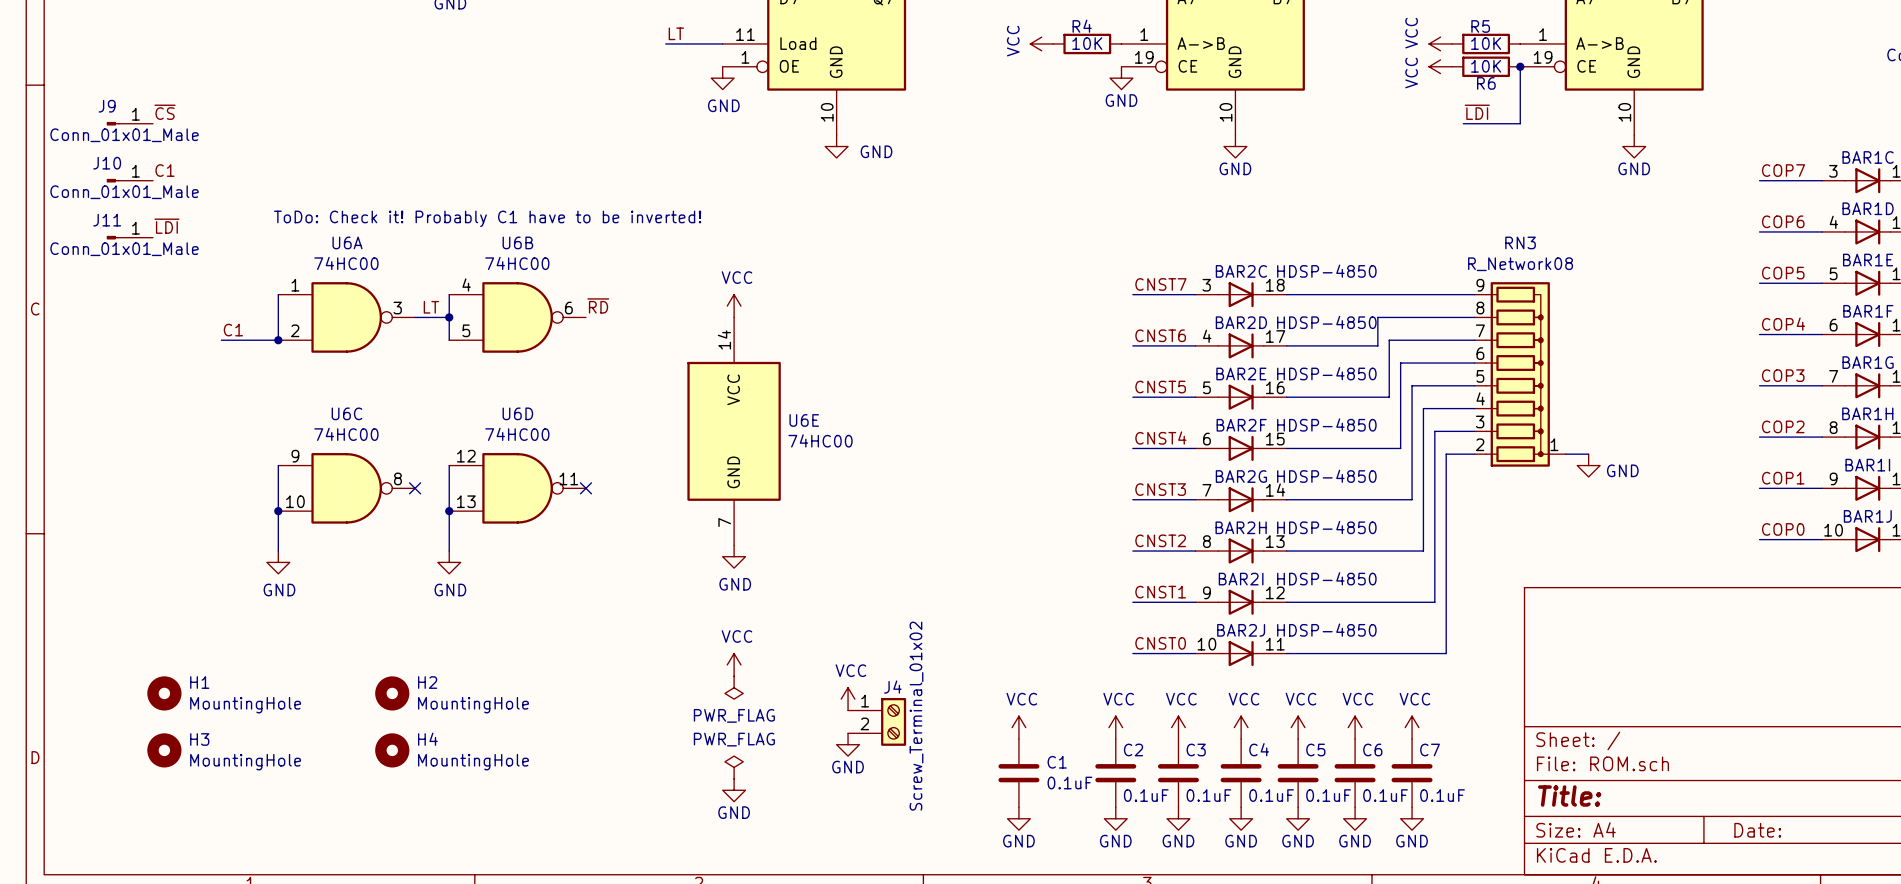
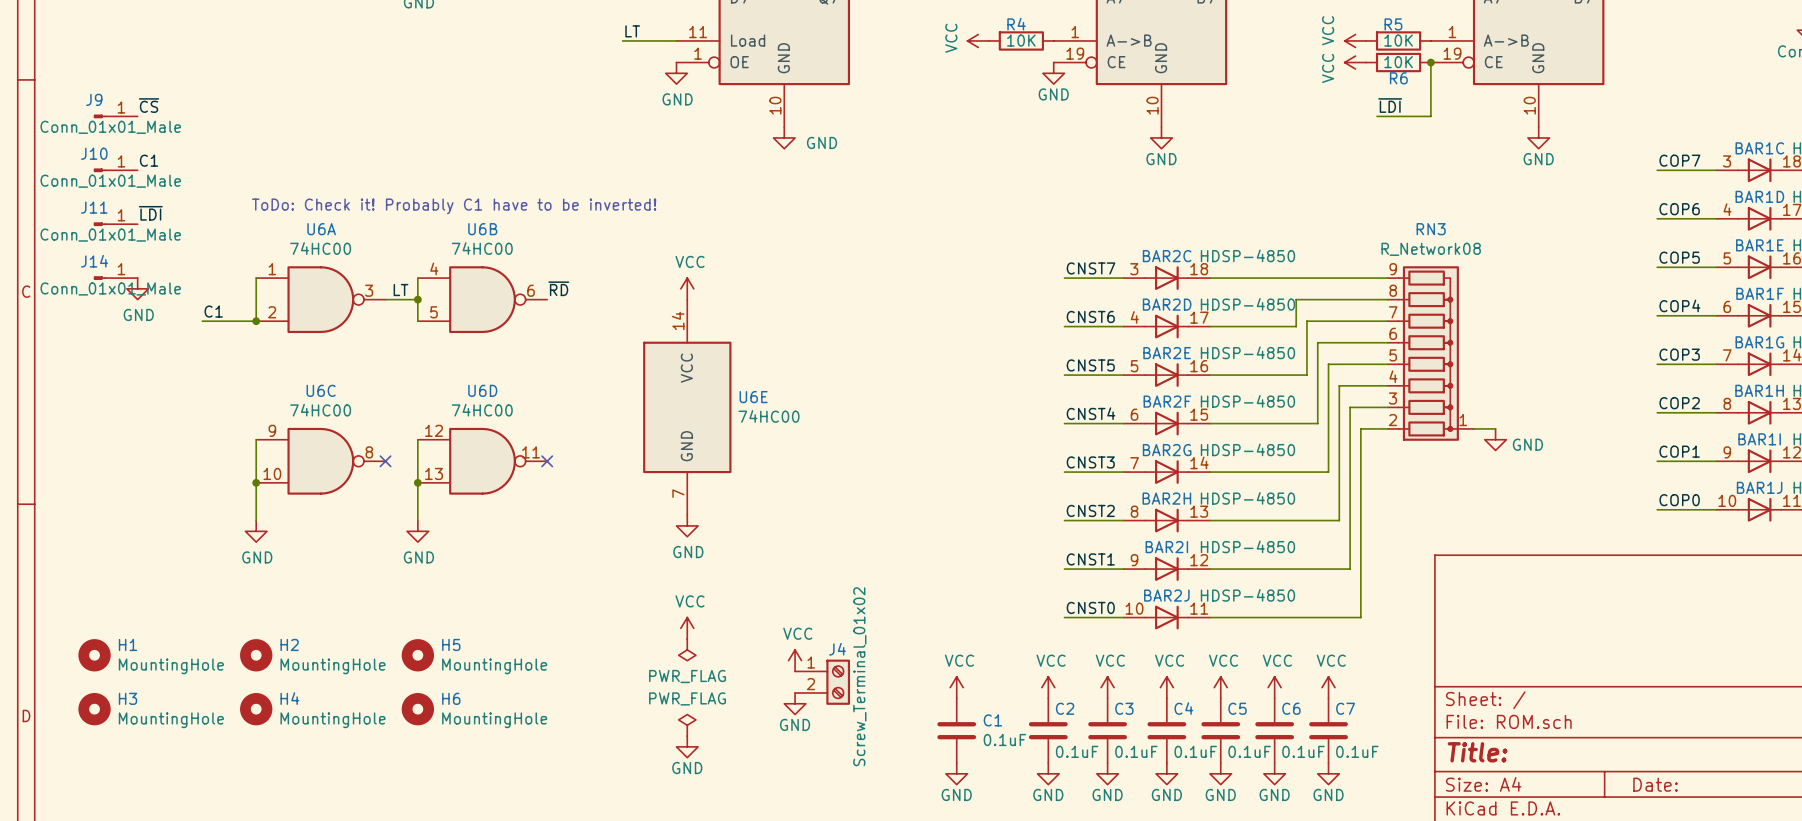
J14: none -> Conn_01x01_Male (115, 278)
power symbol: none -> GND (137, 288)
H1 position: (164, 693) -> (94, 655)
H2 position: (392, 693) -> (256, 655)
H5: none -> MountingHole (417, 655)
H3 position: (164, 750) -> (94, 709)
H4 position: (392, 750) -> (256, 709)
H6: none -> MountingHole (417, 709)

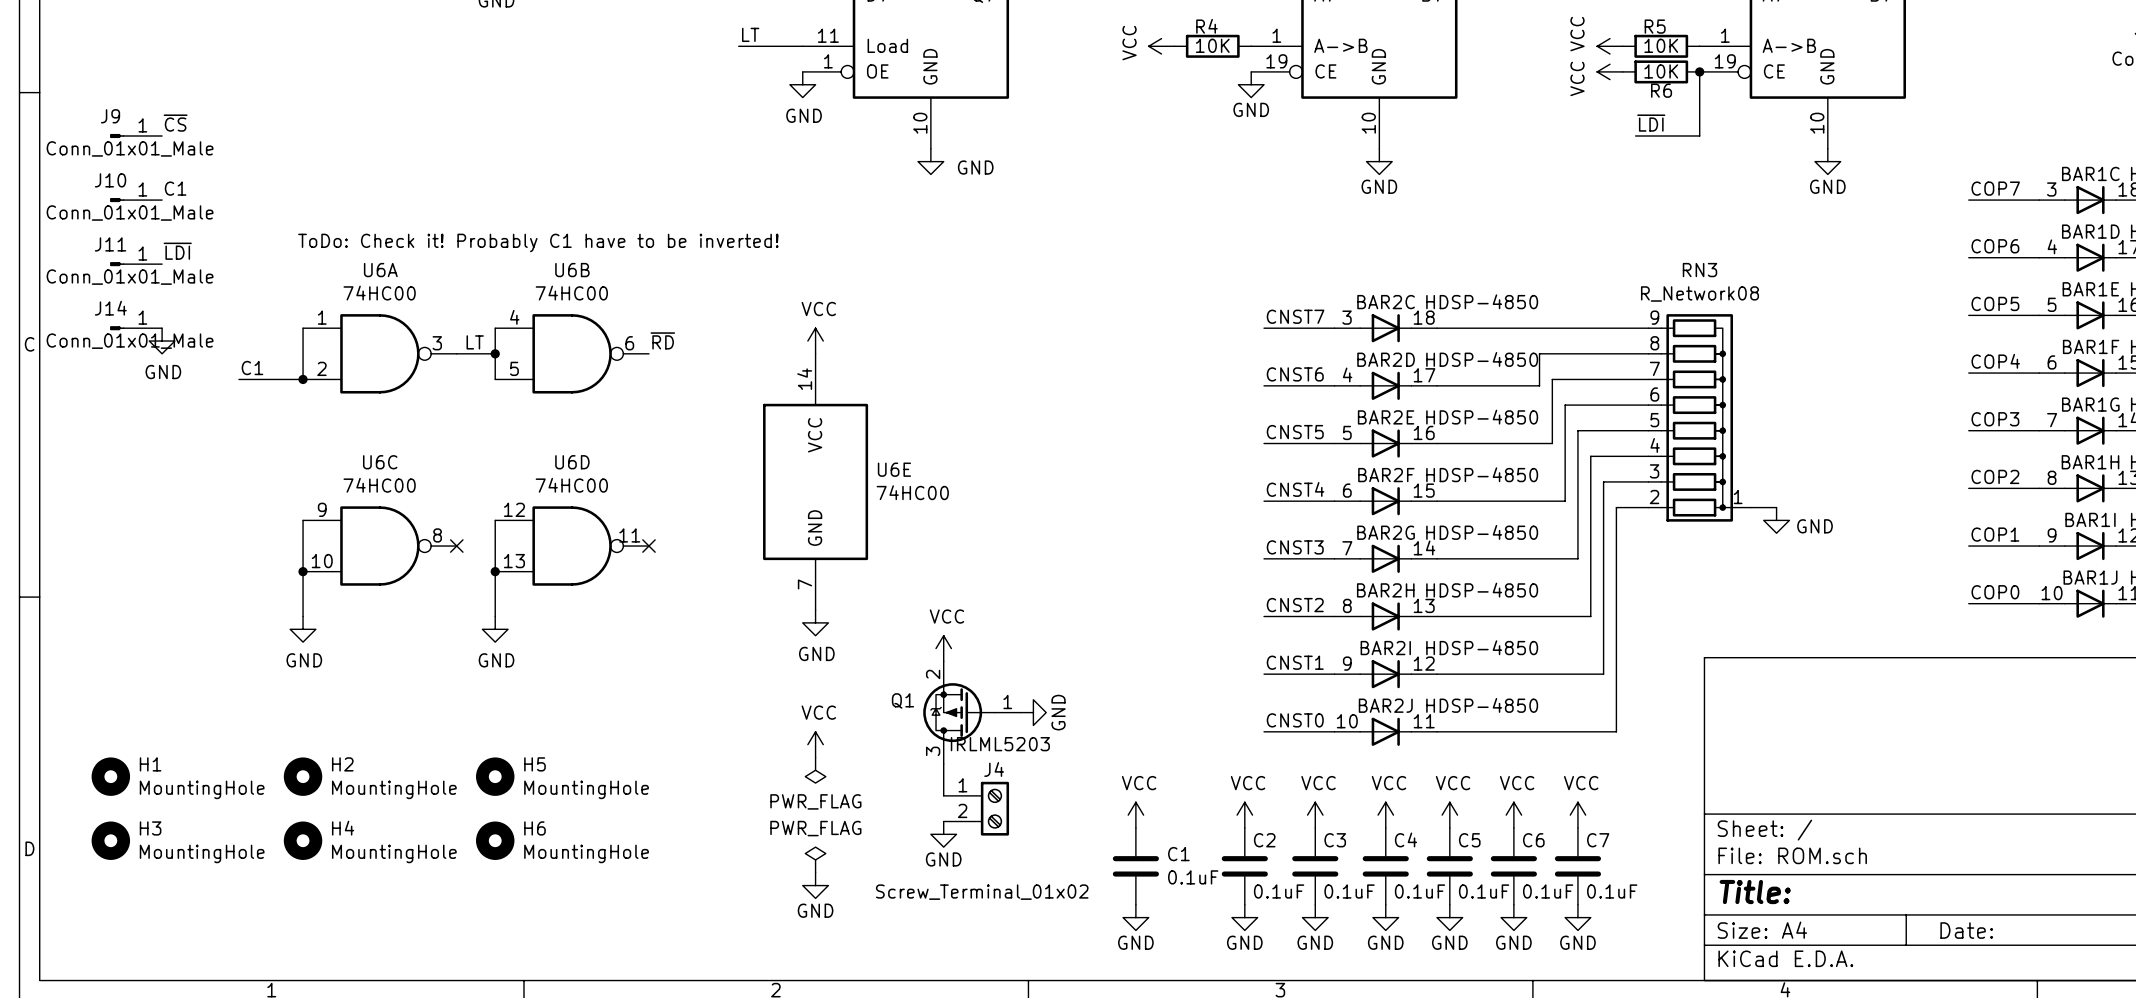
Q1: none -> IRLML5203 (971, 712)
power symbol: none -> GND (1033, 712)
power symbol position: VCC (795, 660) -> VCC (943, 648)
J4 value rotation: 0° (859, 676) -> 90° clockwise (982, 892)

